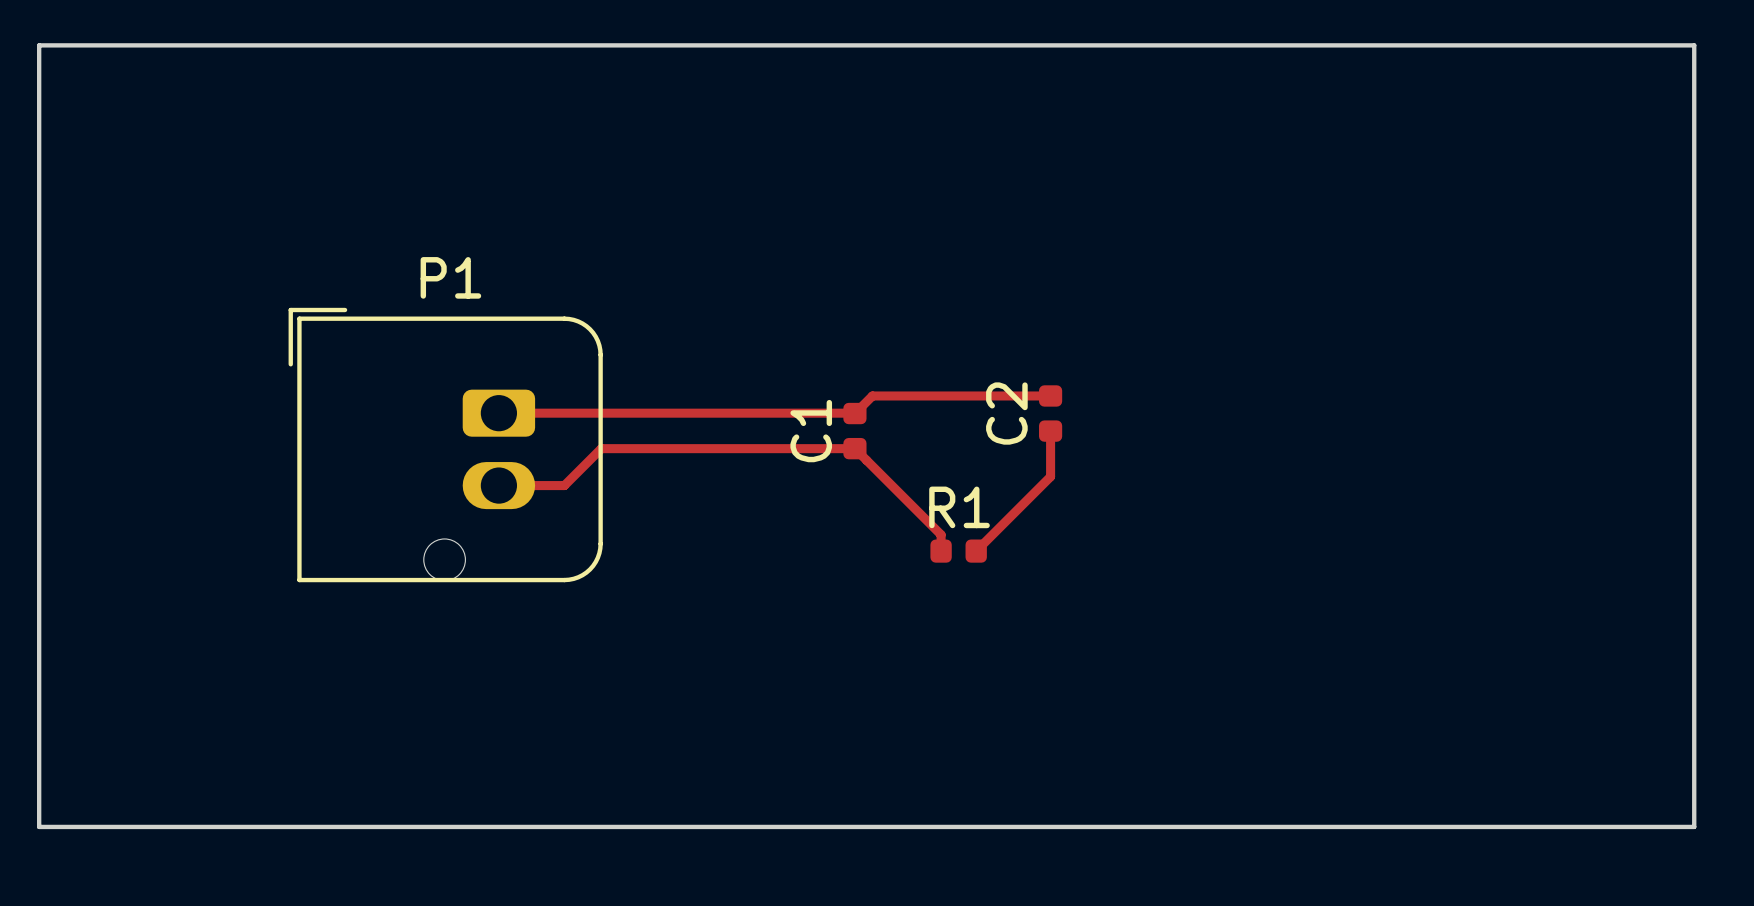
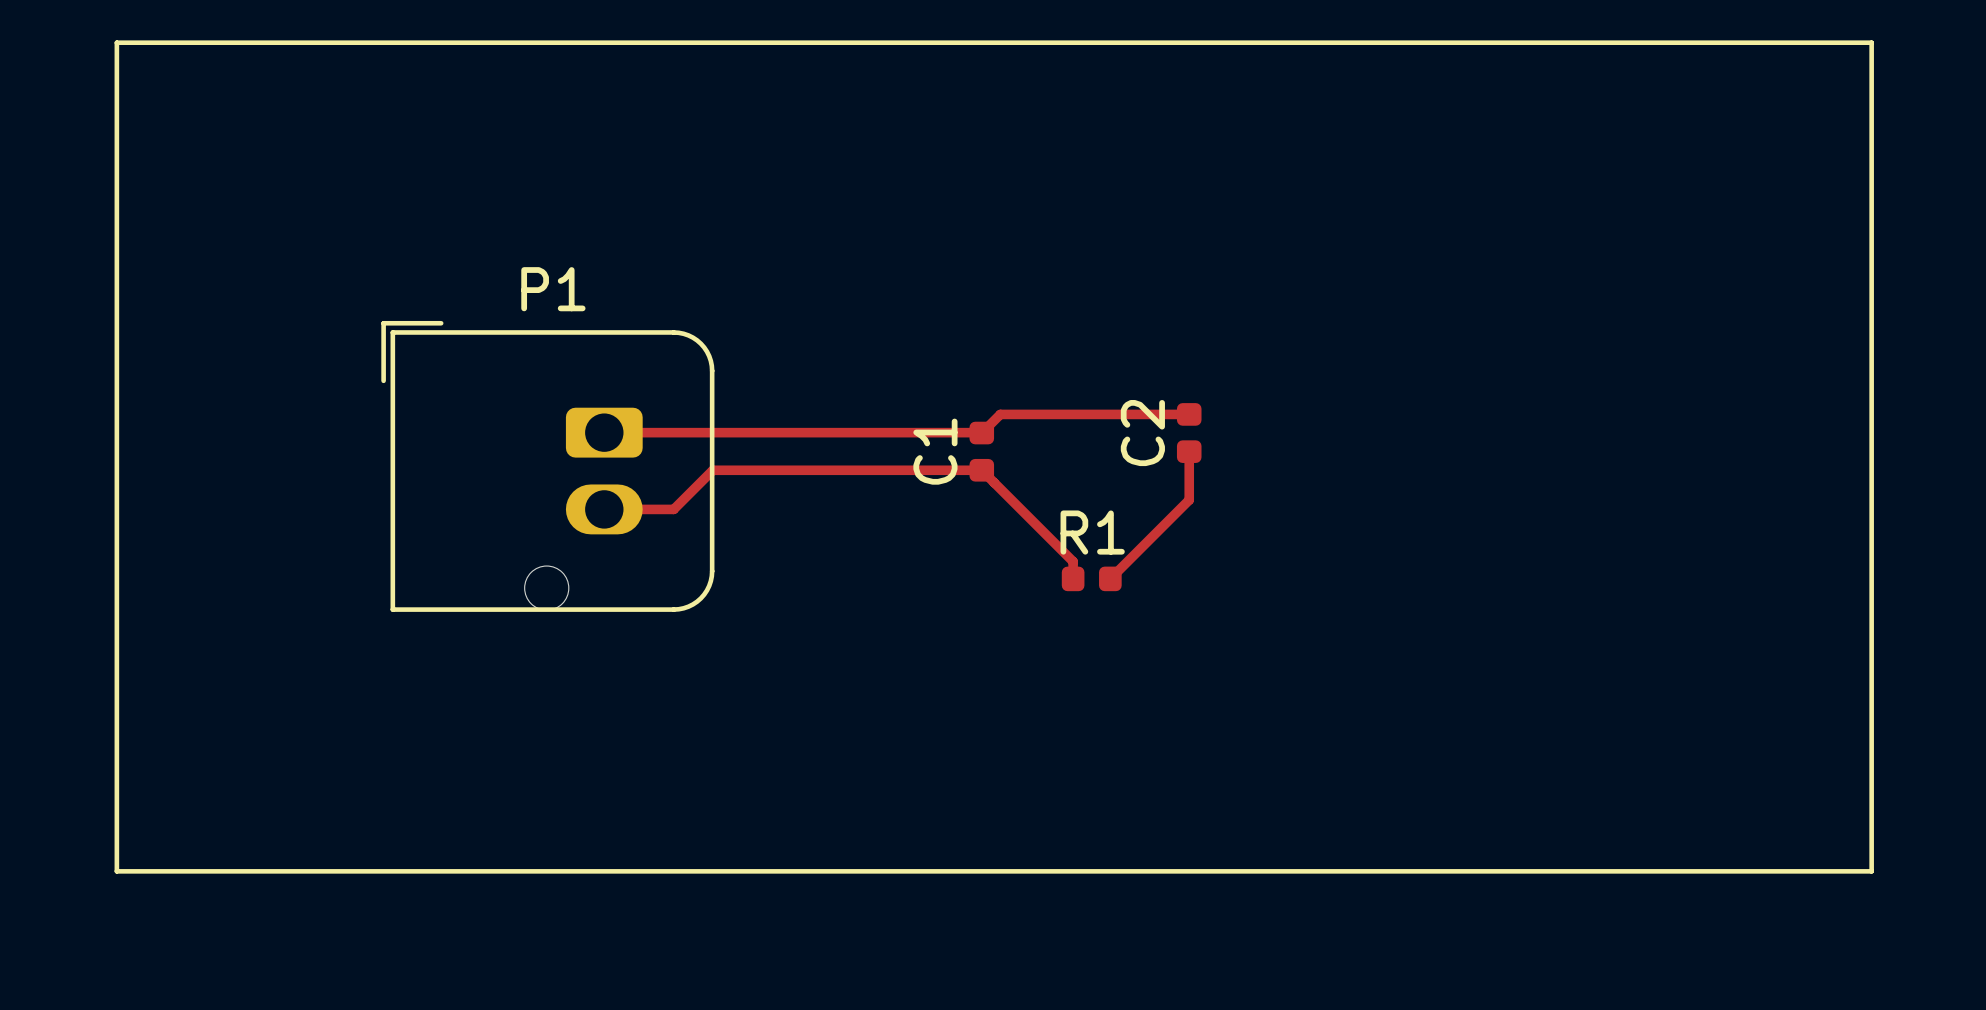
board edge: (39, 45) (1694, 45) (1694, 826) (39, 826) (39, 45) -> none
line: none -> (116, 42) (1871, 42) (1871, 871) (116, 871) (116, 42)

